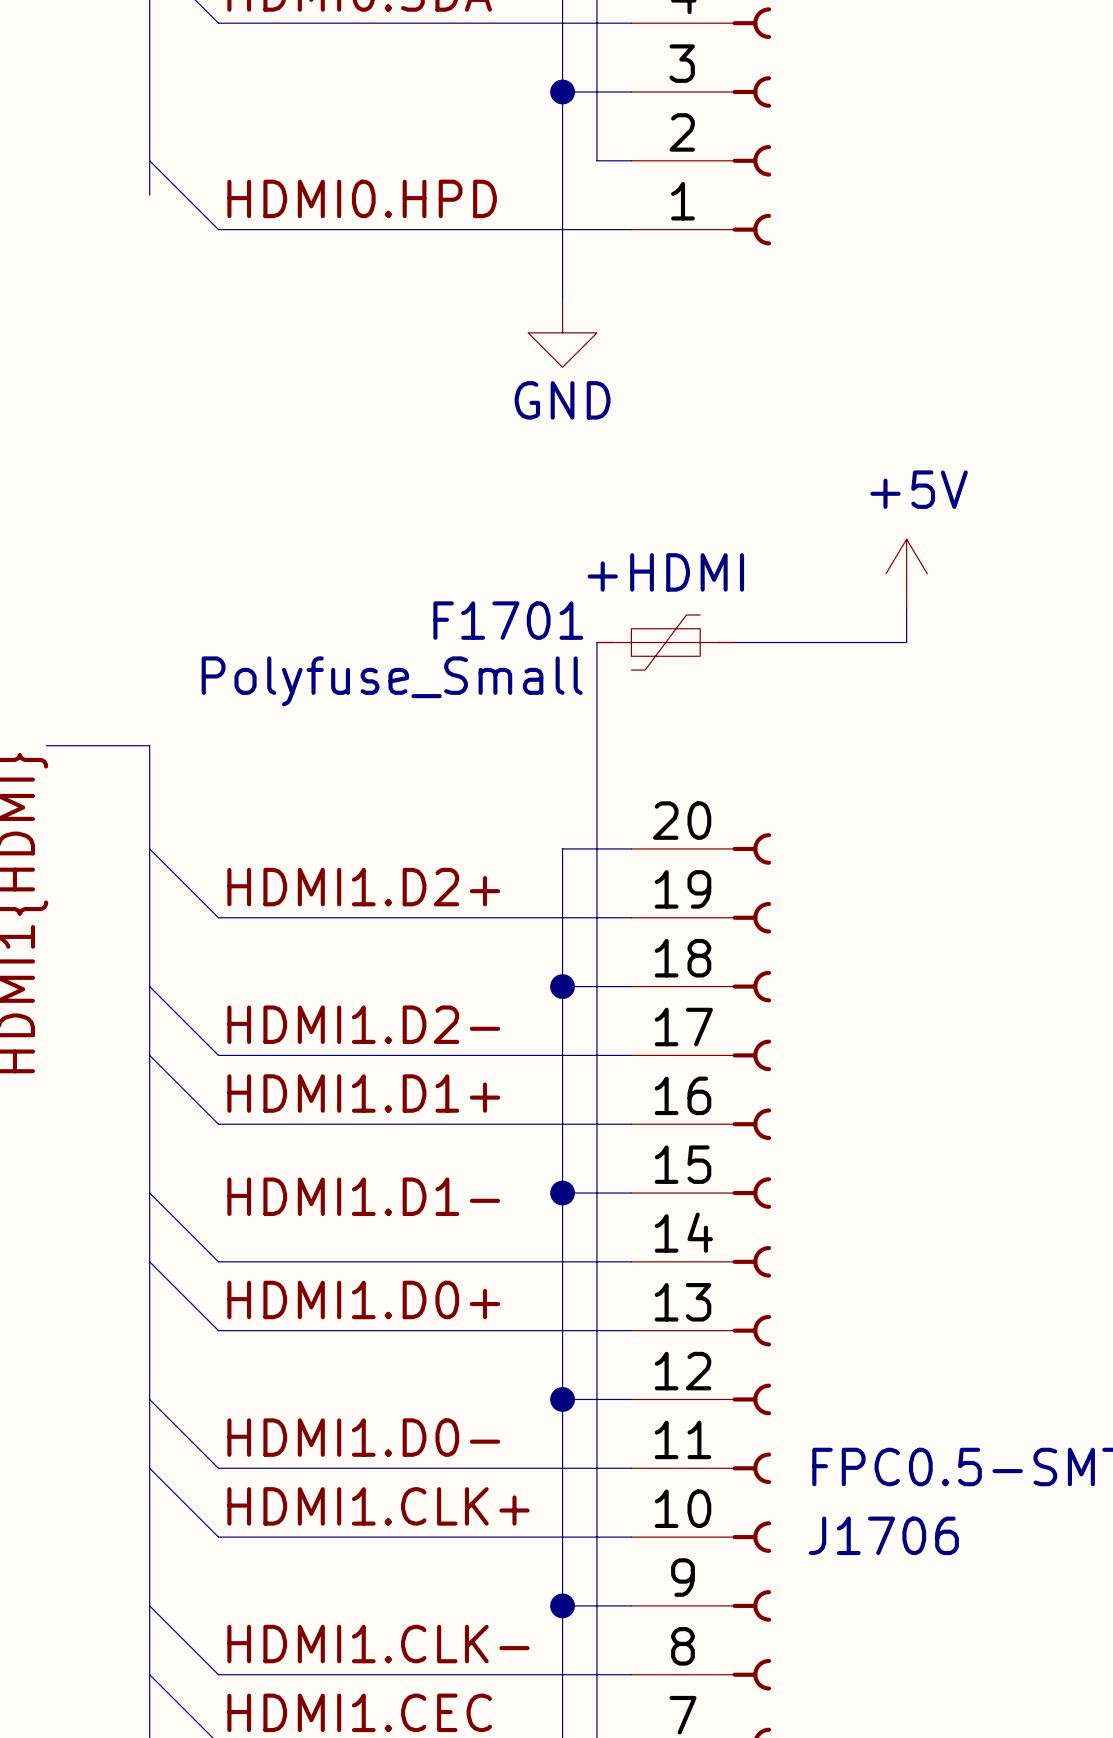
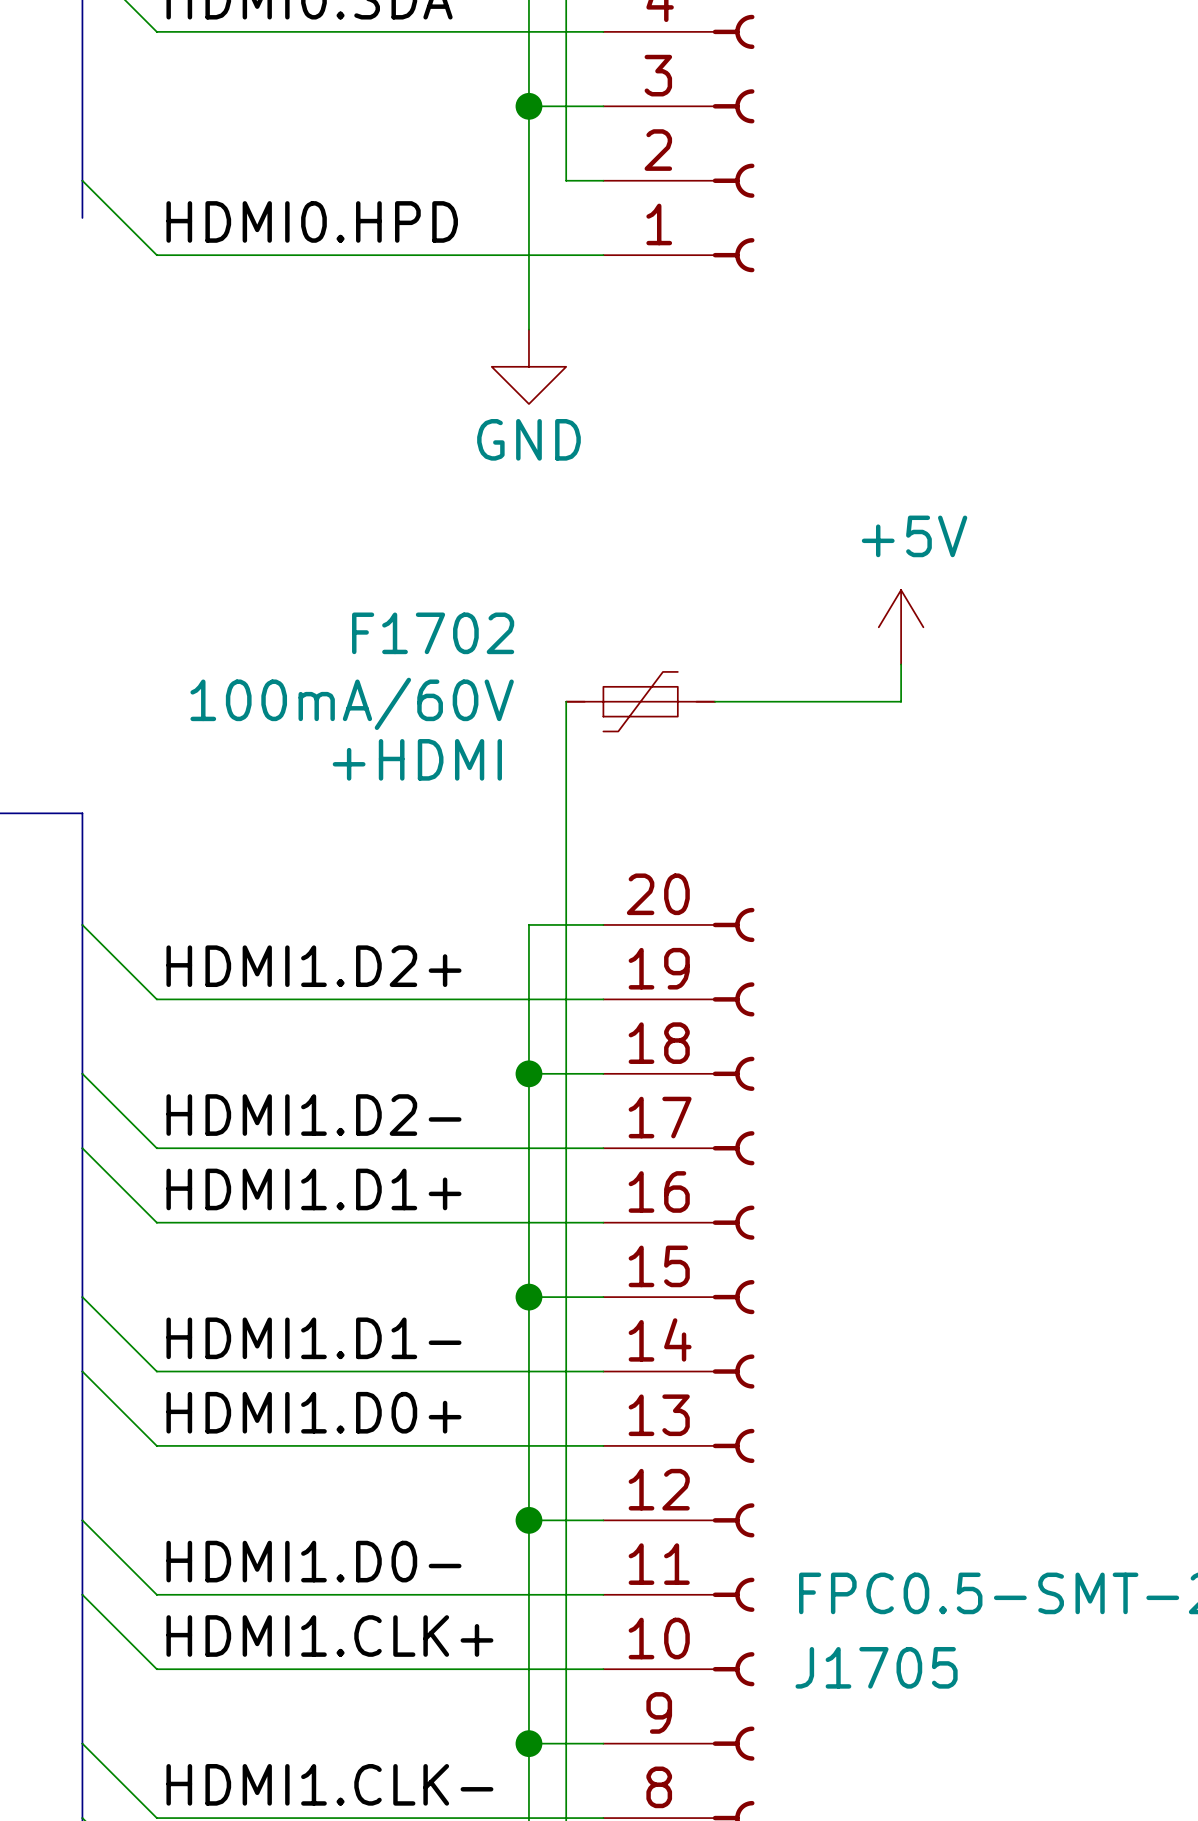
F1701 text position: +HDMI (665, 572) -> +HDMI (417, 759)
F1701 name: F1701 (508, 620) -> F1702 (433, 633)
F1701 value: Polyfuse_Small (392, 681) -> 100mA/60V (352, 703)
label position: HDMI1.D1- (363, 1196) -> HDMI1.D1- (313, 1338)
J1706 name: J1706 (883, 1535) -> J1705 (876, 1667)

